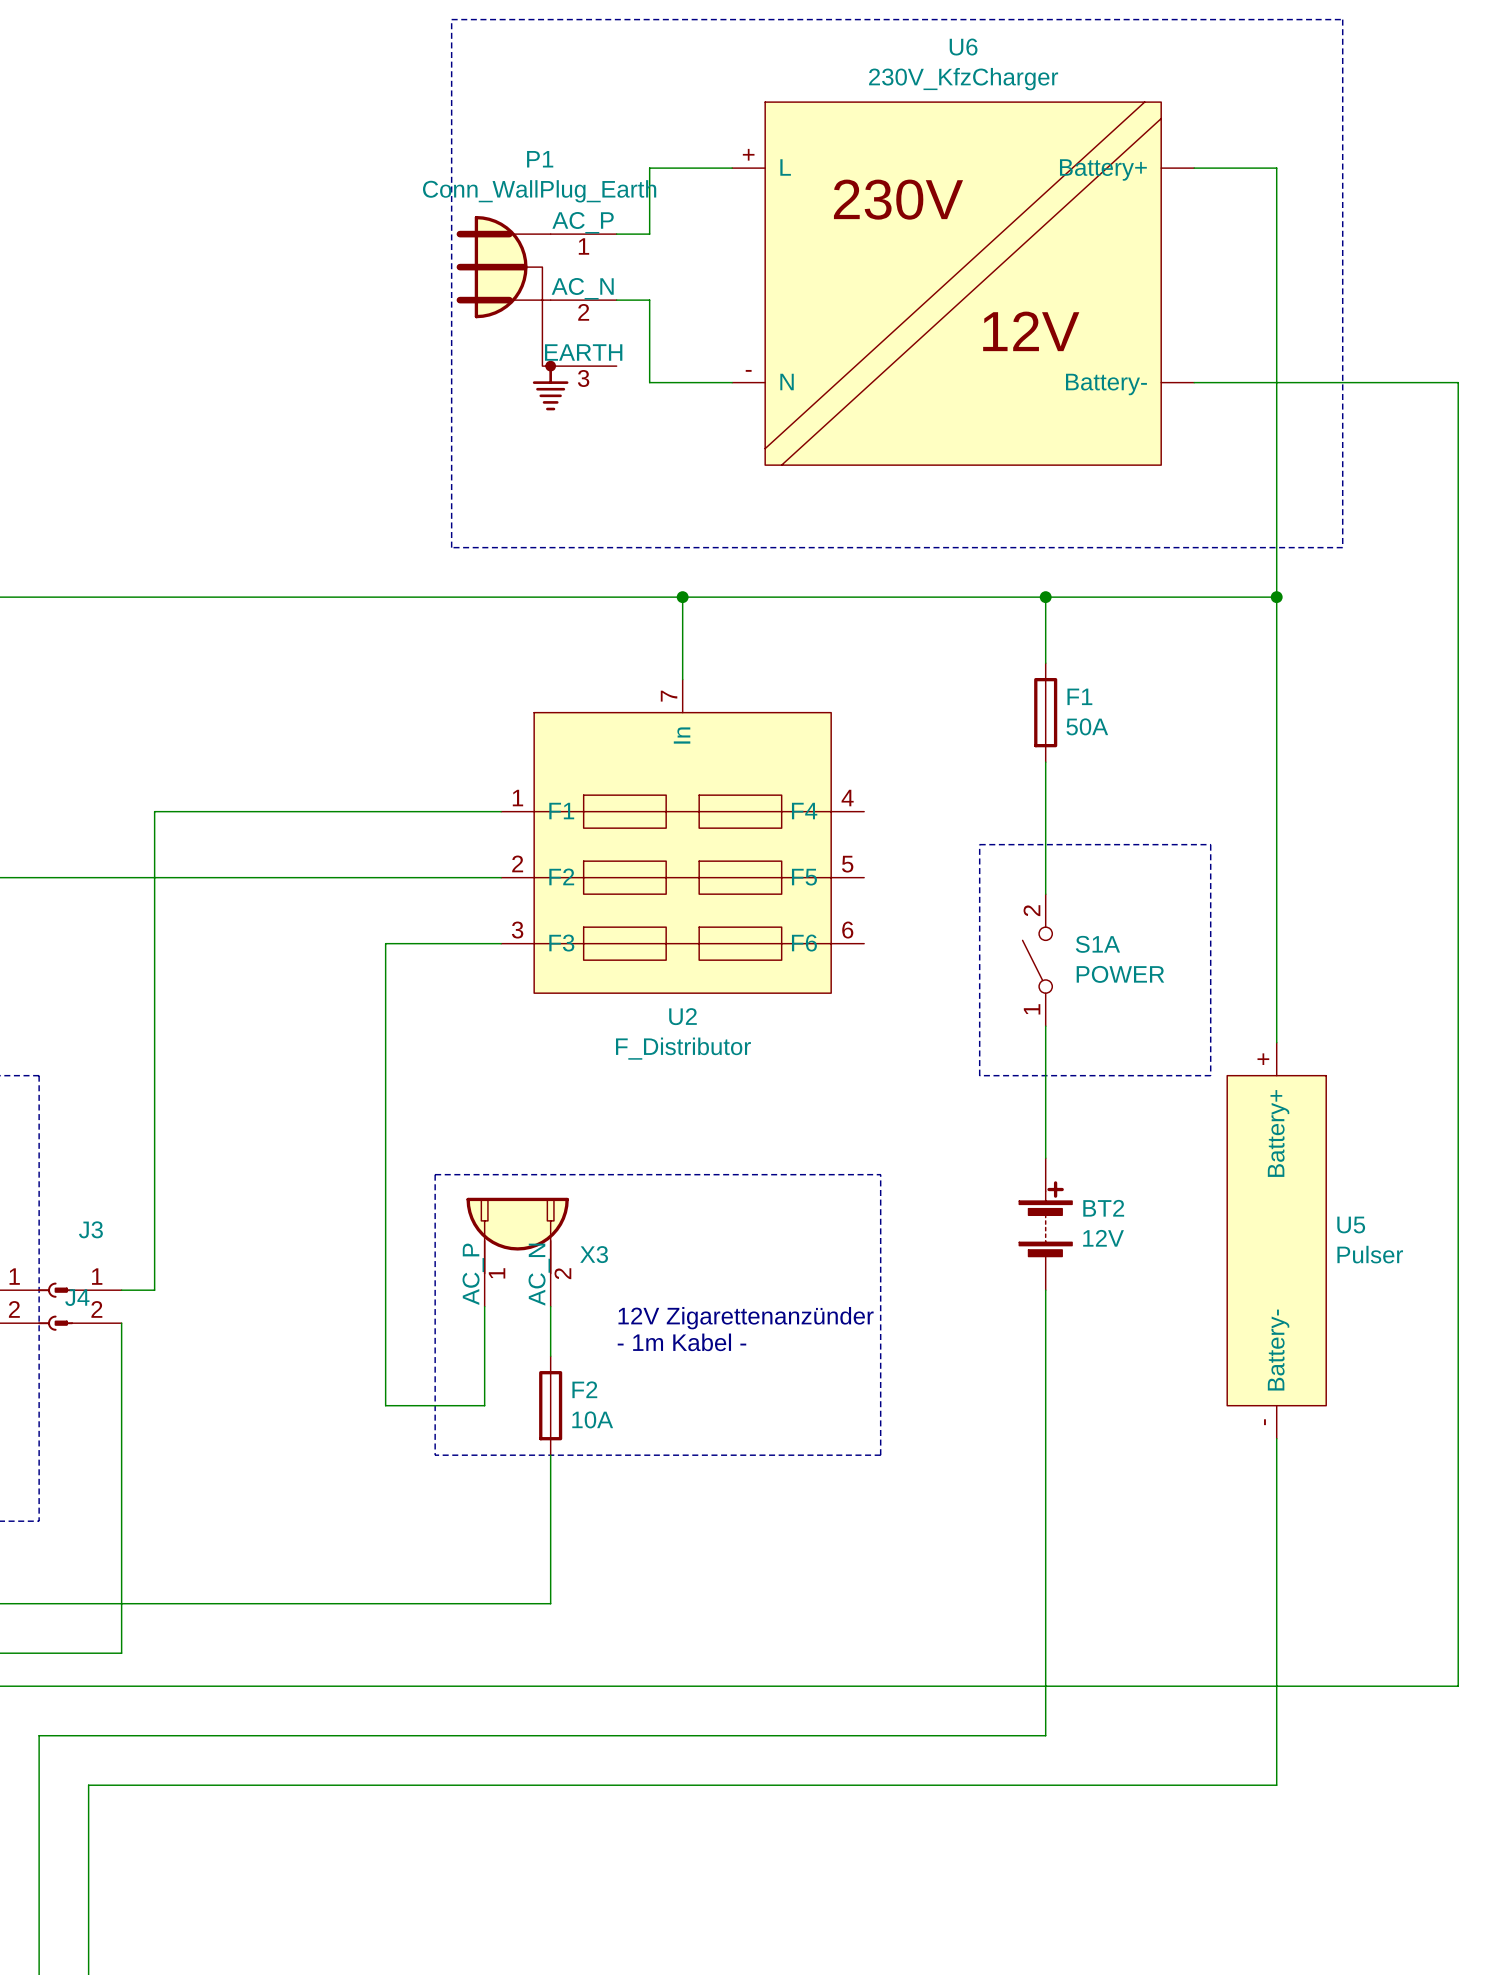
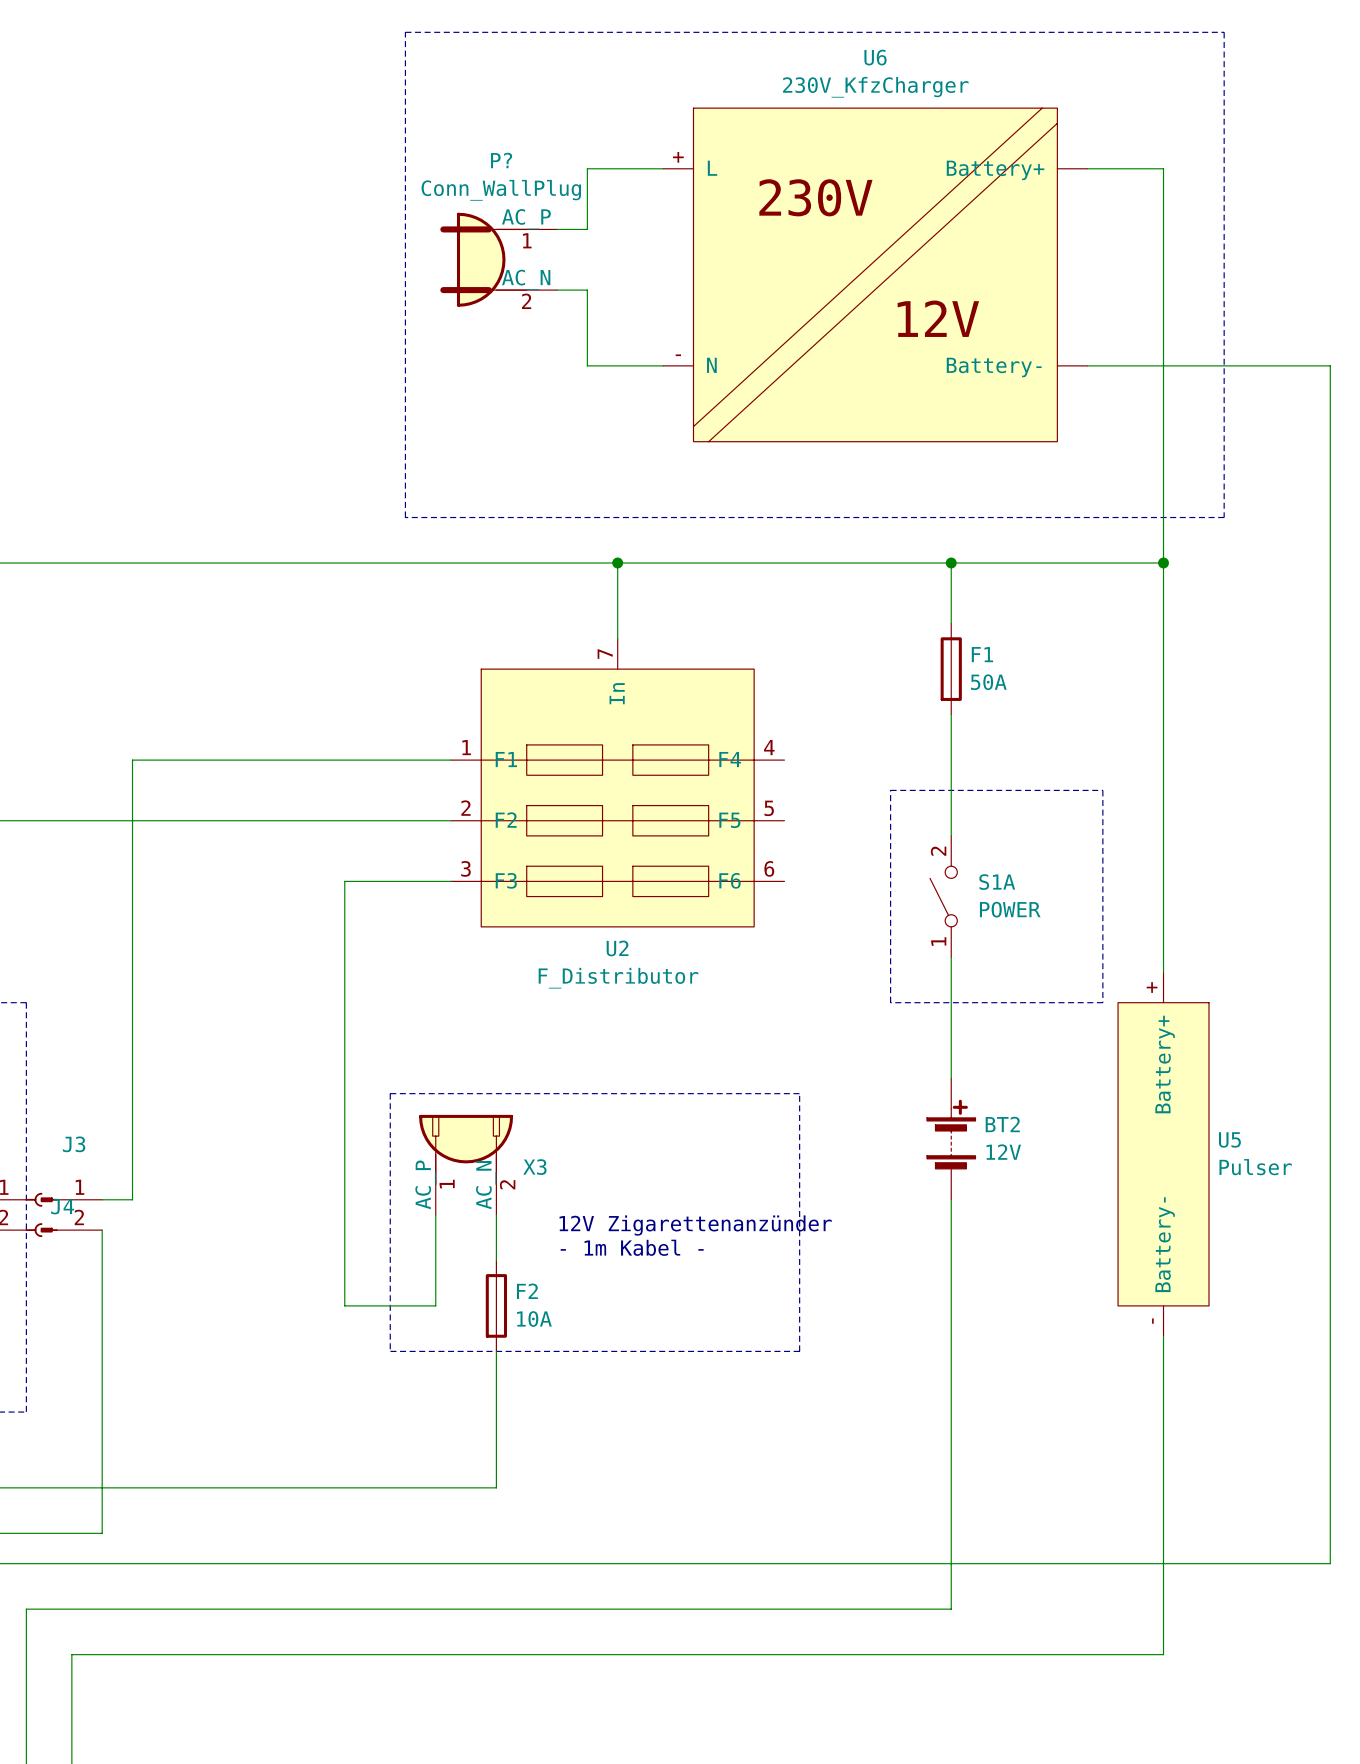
P?: none -> Conn_WallPlug (498, 259)
P1: Conn_WallPlug_Earth (536, 313) -> none

